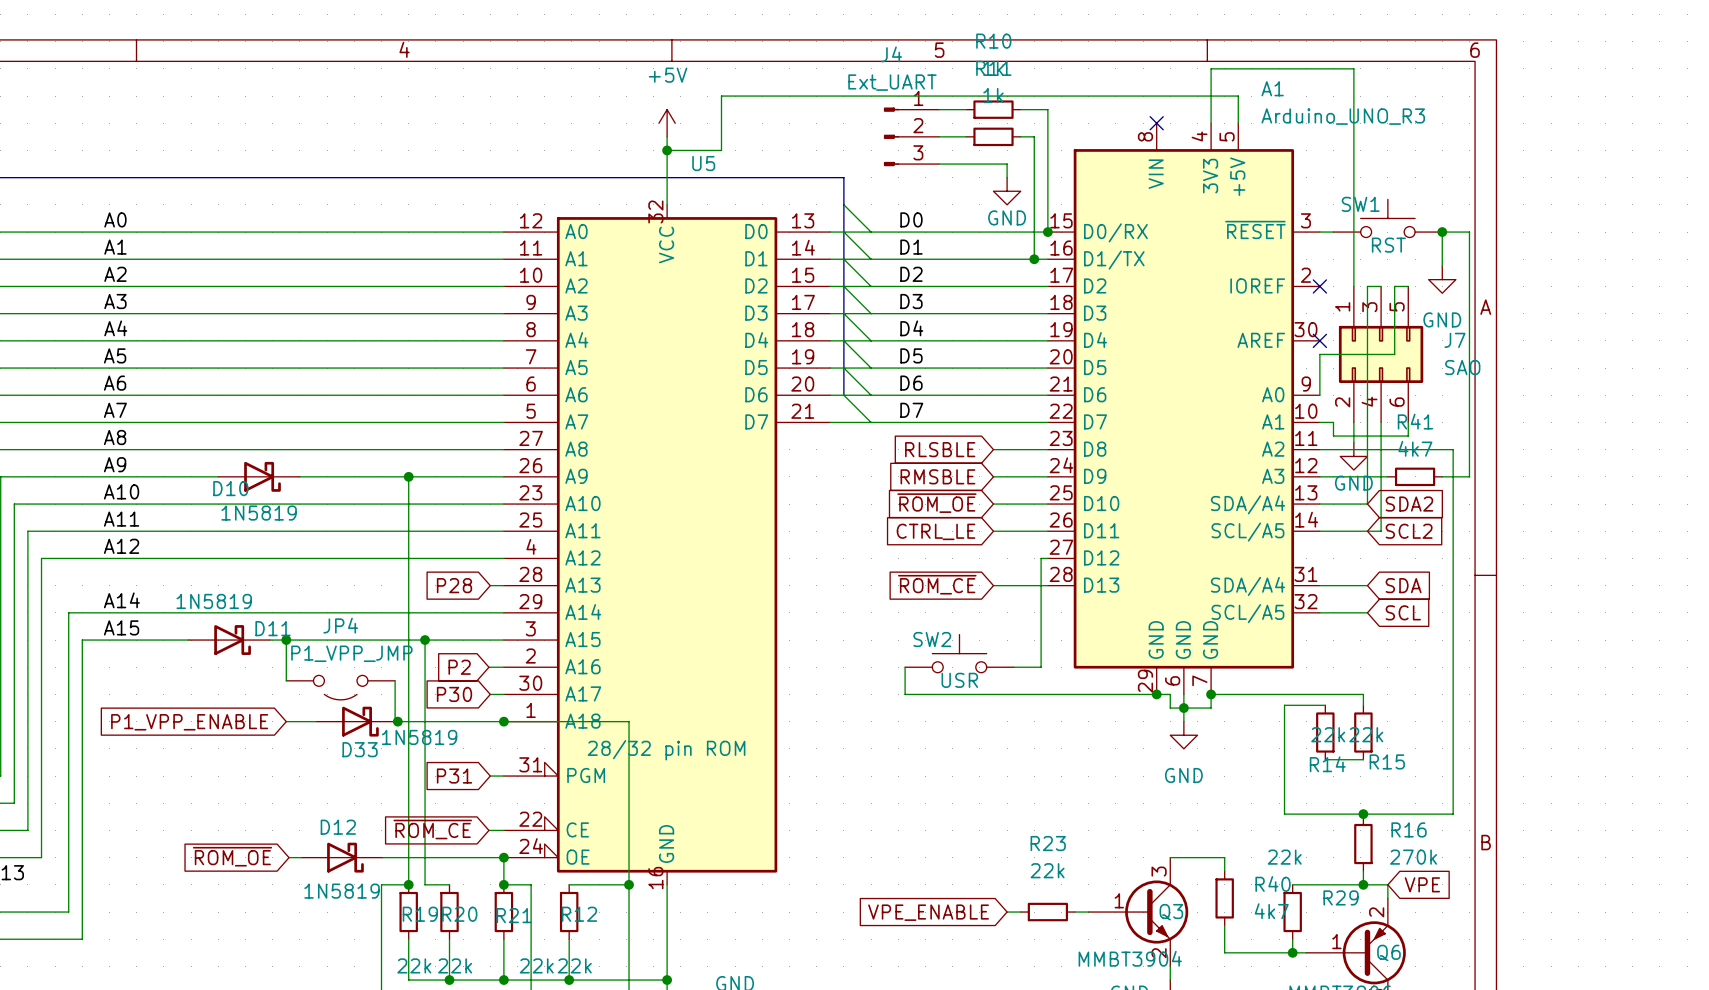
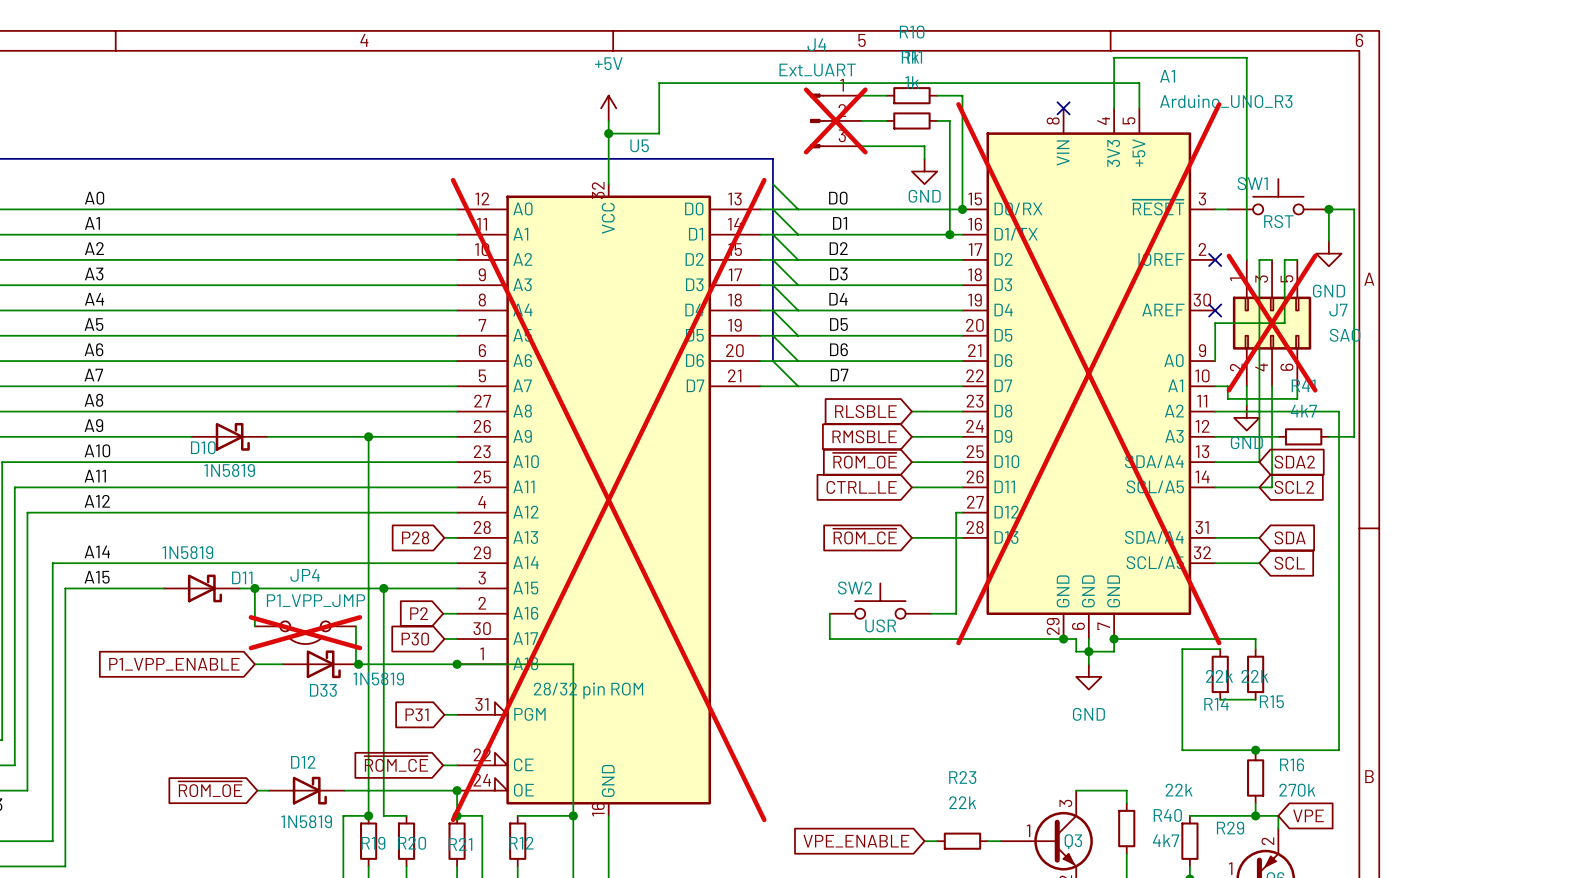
J4 do-not-place cross: none -> (835, 120)
J7 do-not-place cross: none -> (1272, 323)
A1 do-not-place cross: none -> (1088, 373)
U5 do-not-place cross: none -> (608, 500)
JP4 do-not-place cross: none -> (305, 632)

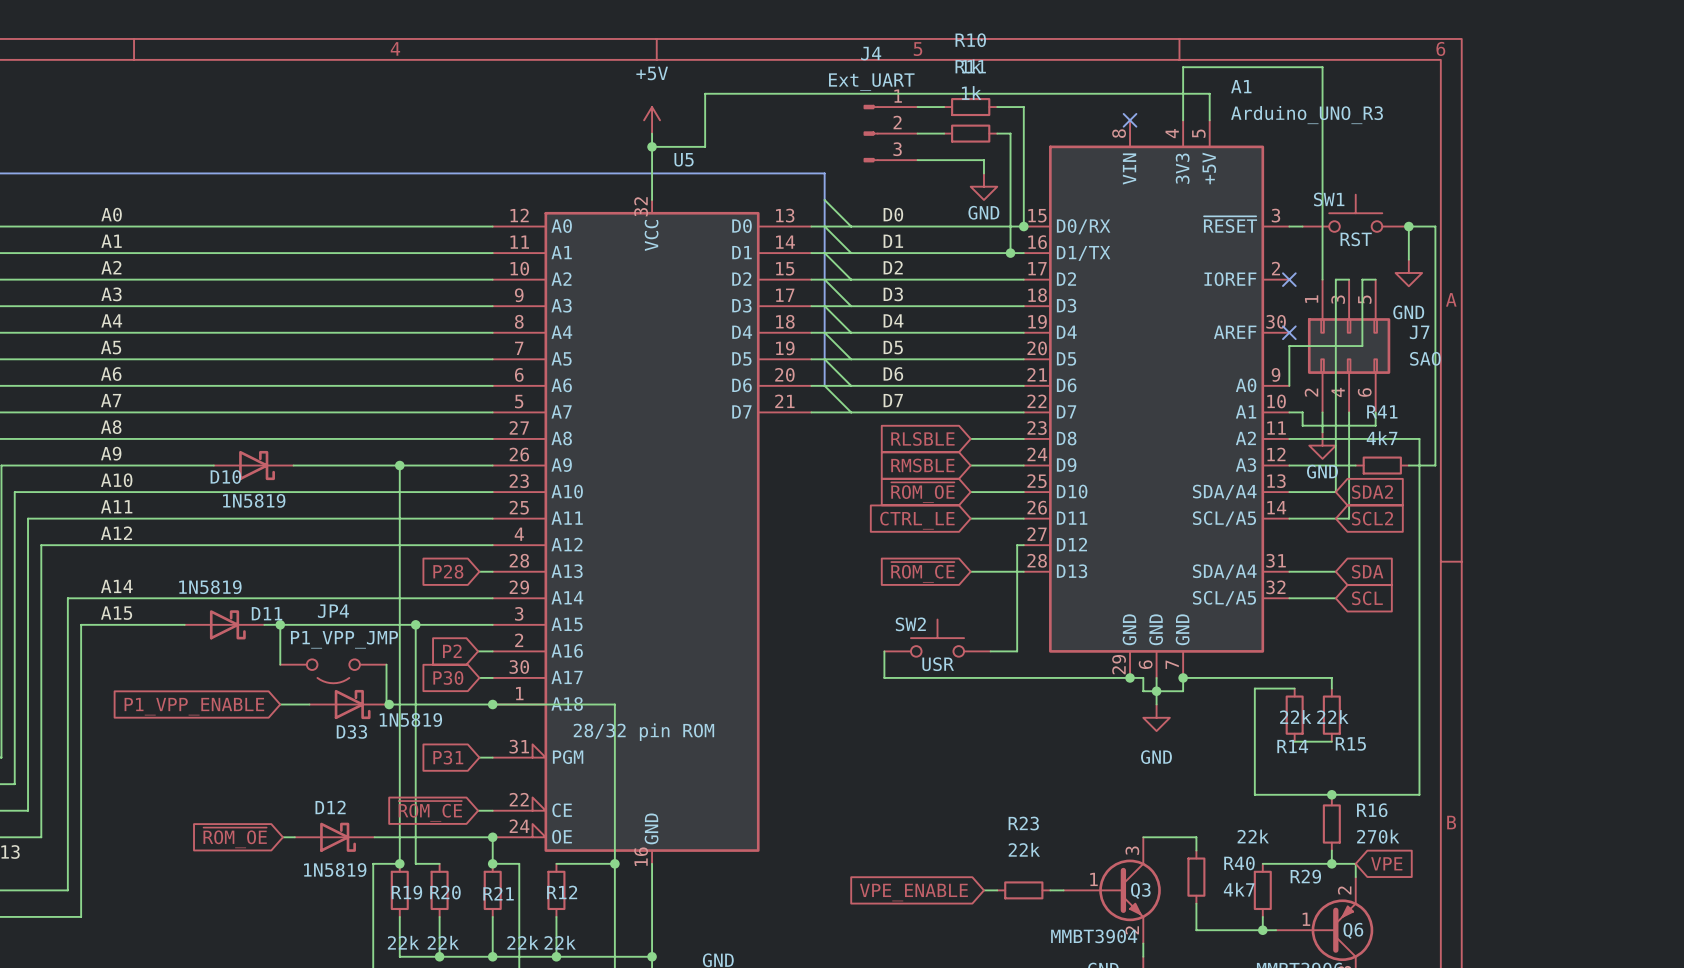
J4 do-not-place cross: (835, 120) -> none
J7 do-not-place cross: (1272, 323) -> none
A1 do-not-place cross: (1088, 373) -> none
U5 do-not-place cross: (608, 500) -> none
JP4 do-not-place cross: (305, 632) -> none

